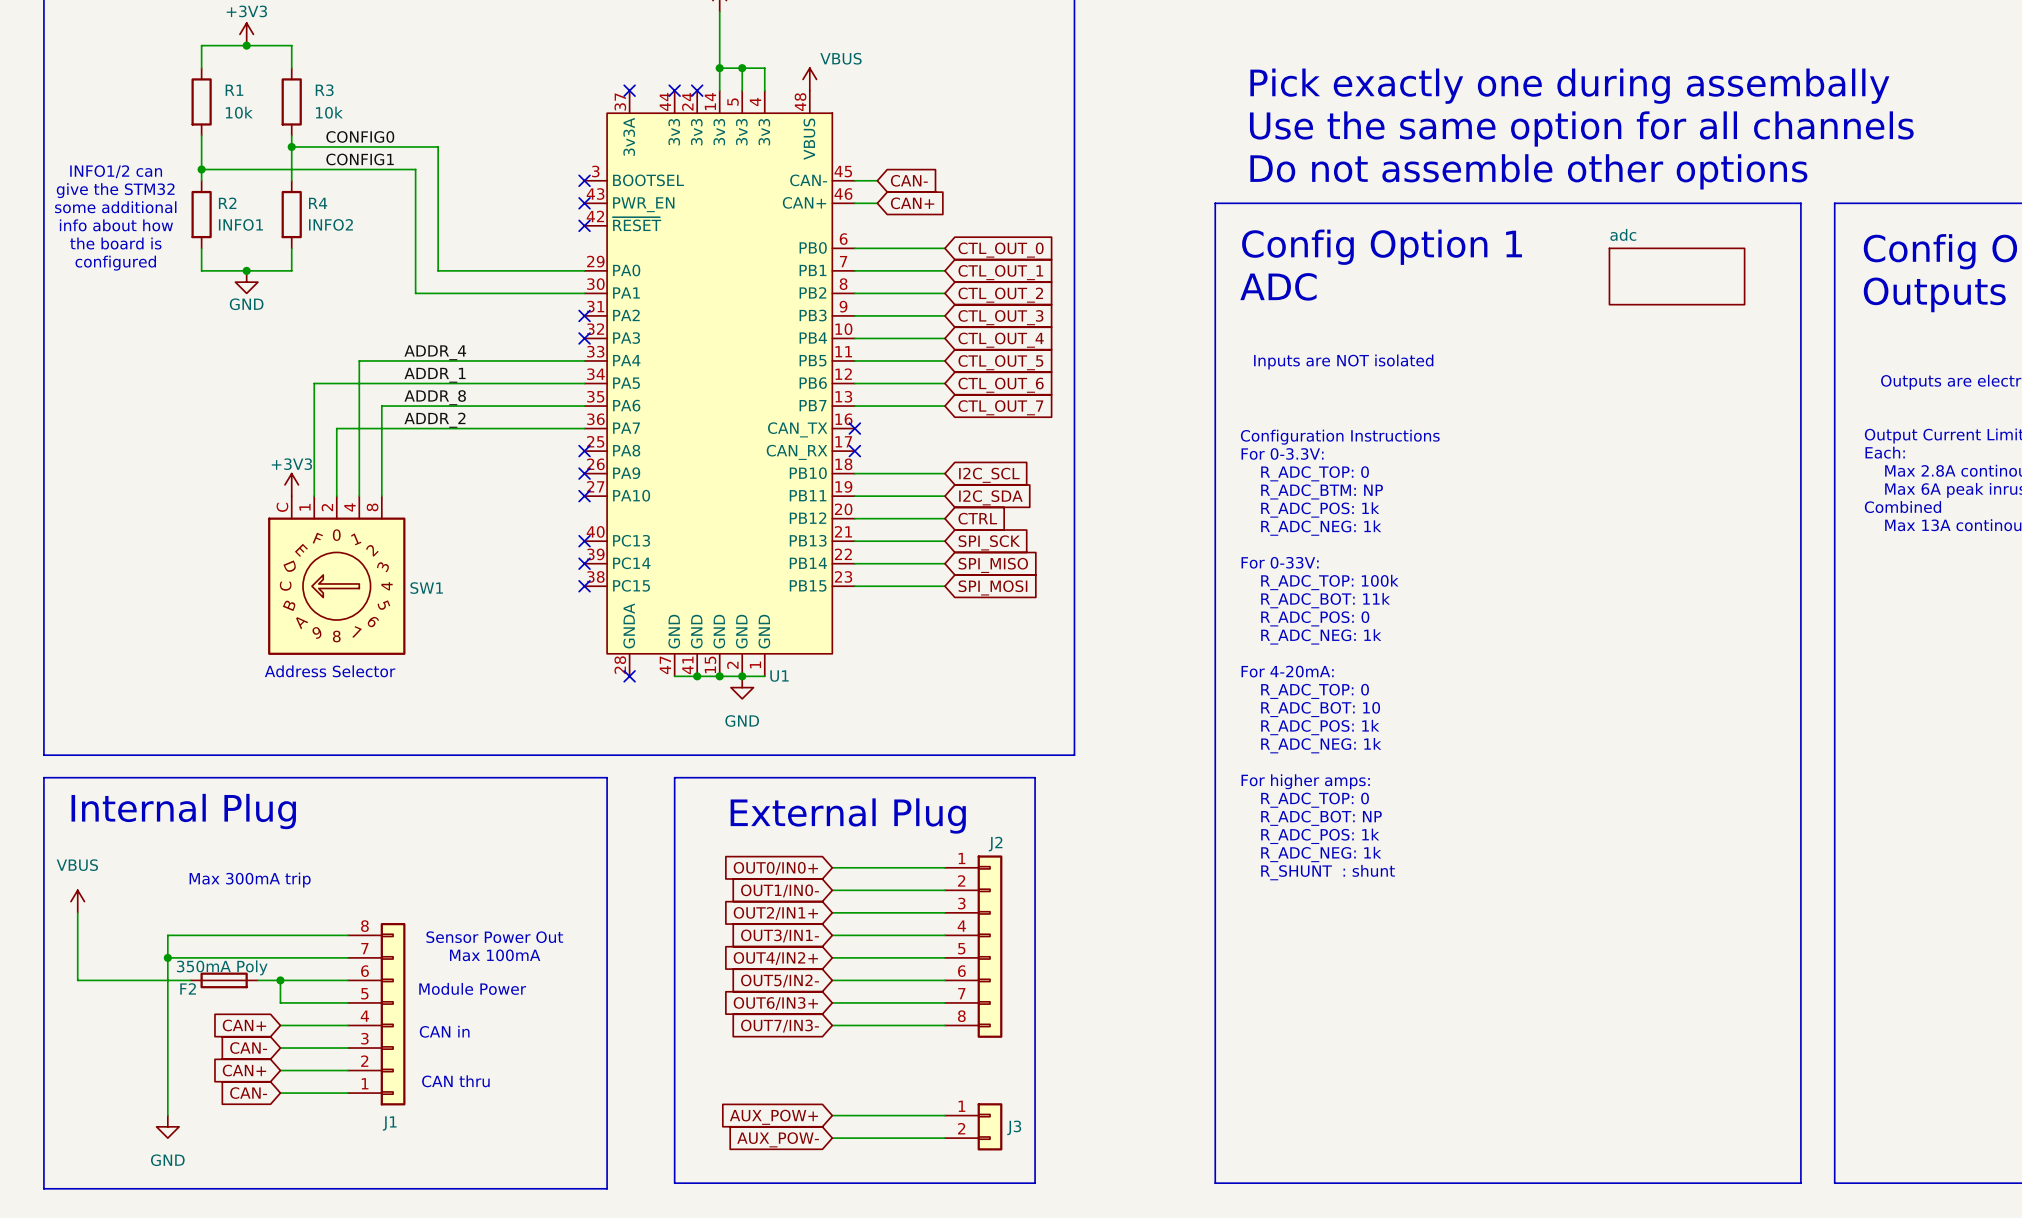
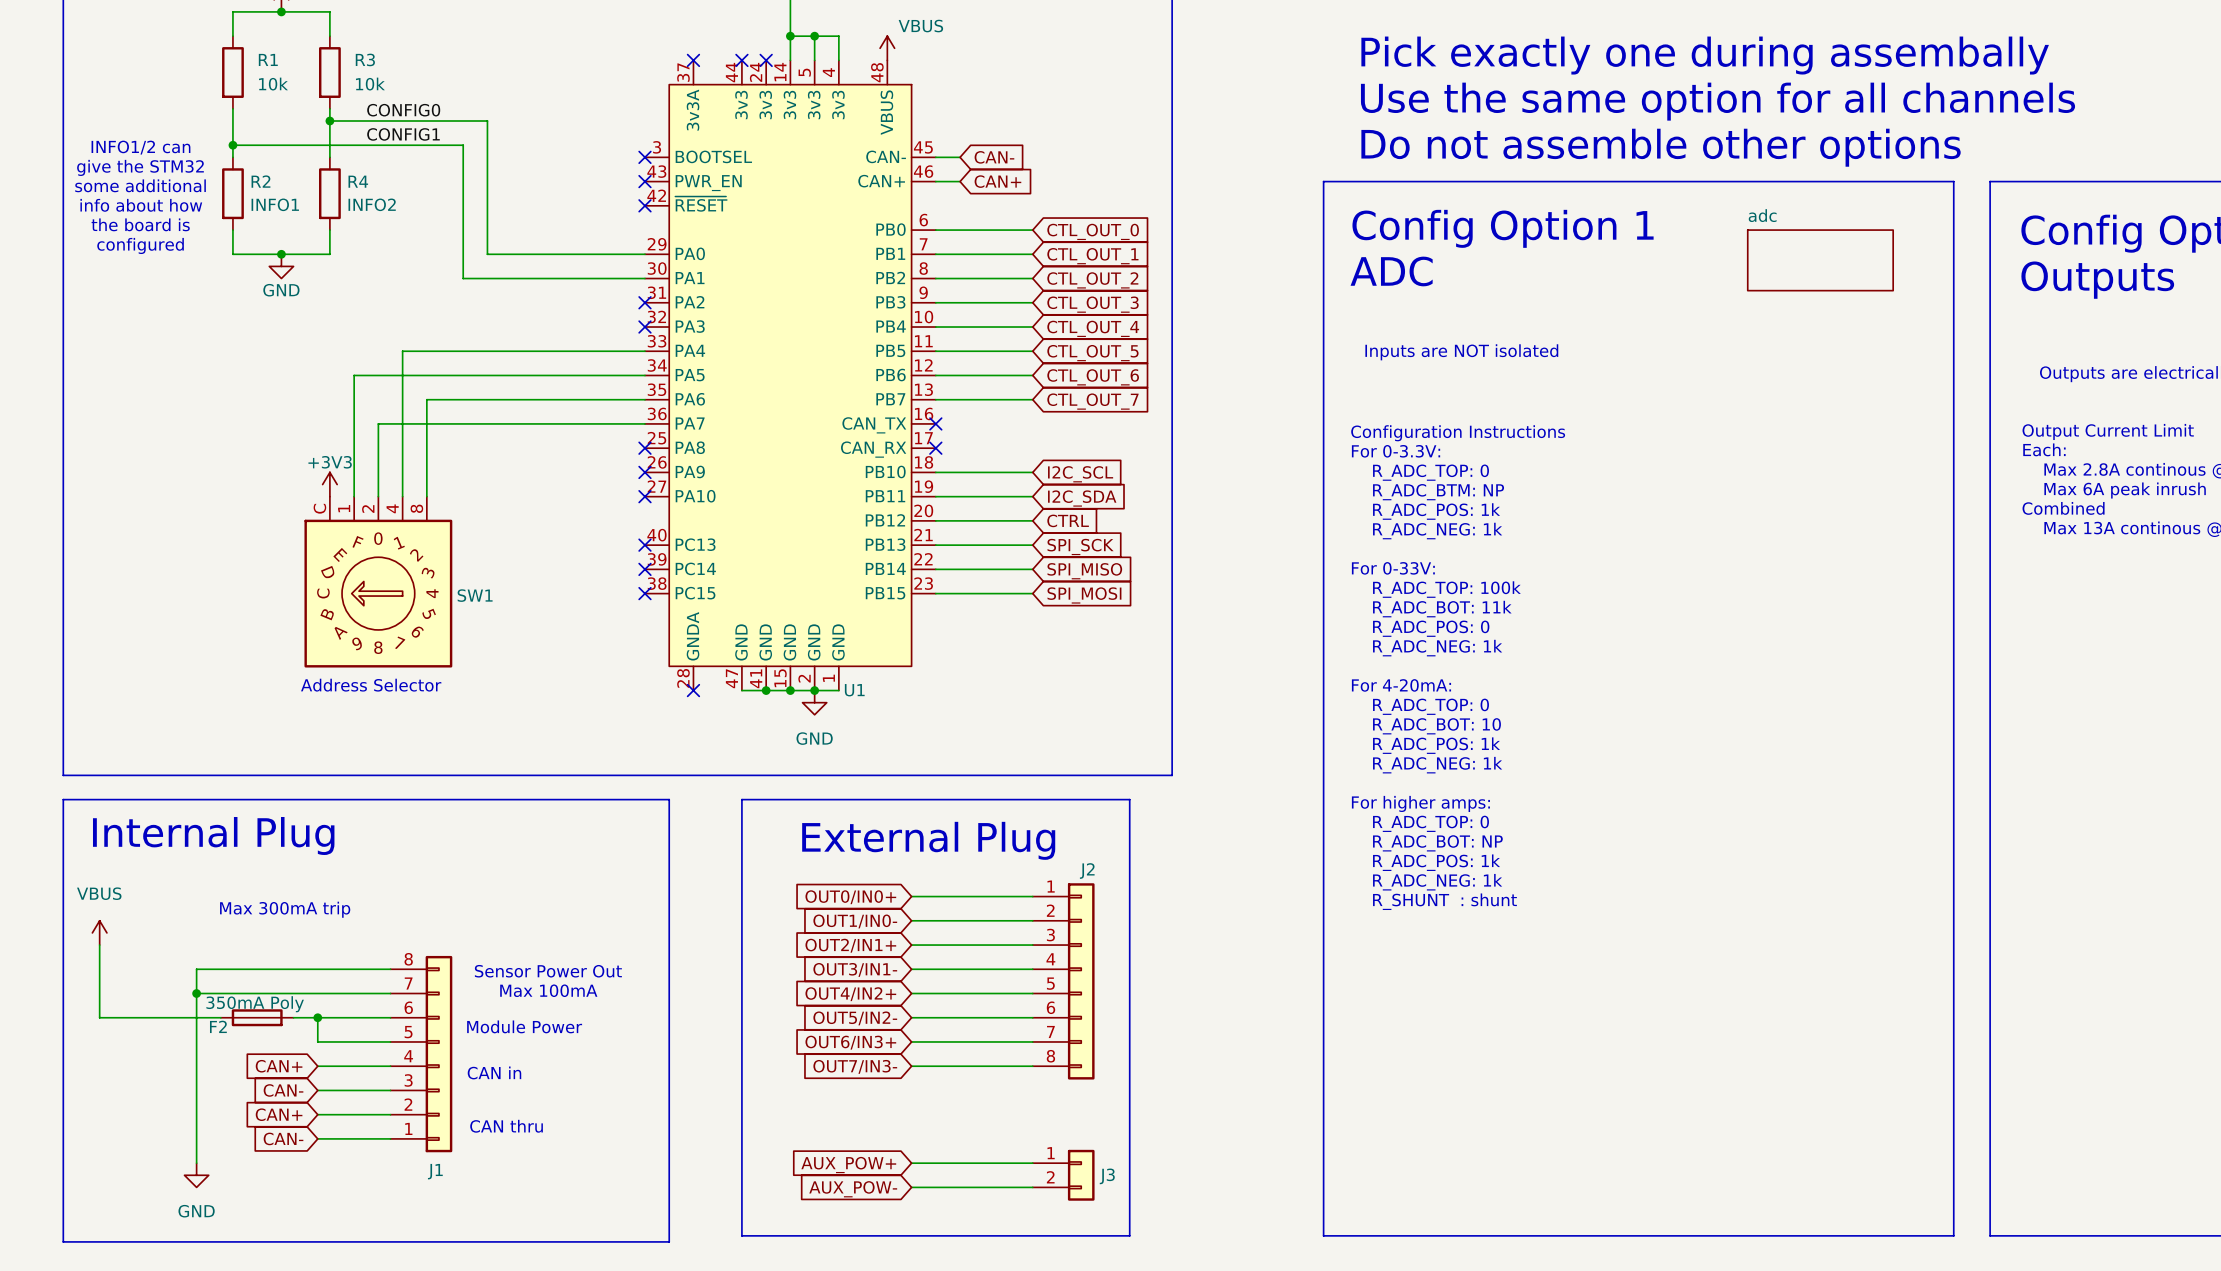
label: ADDR_4 (435, 352) -> none
label: ADDR_1 (435, 375) -> none
label: ADDR_8 (435, 397) -> none
label: ADDR_2 (434, 420) -> none

